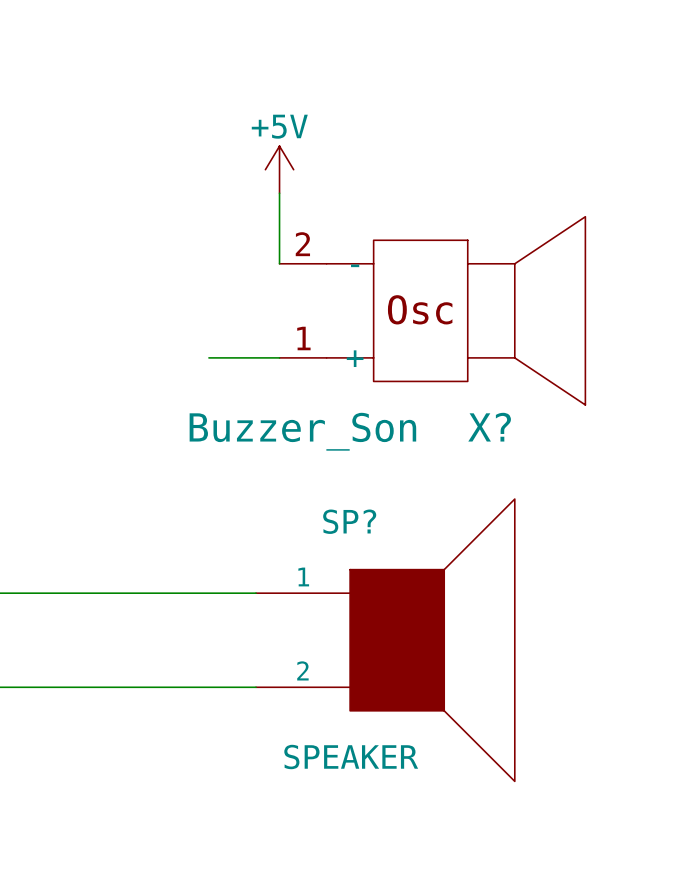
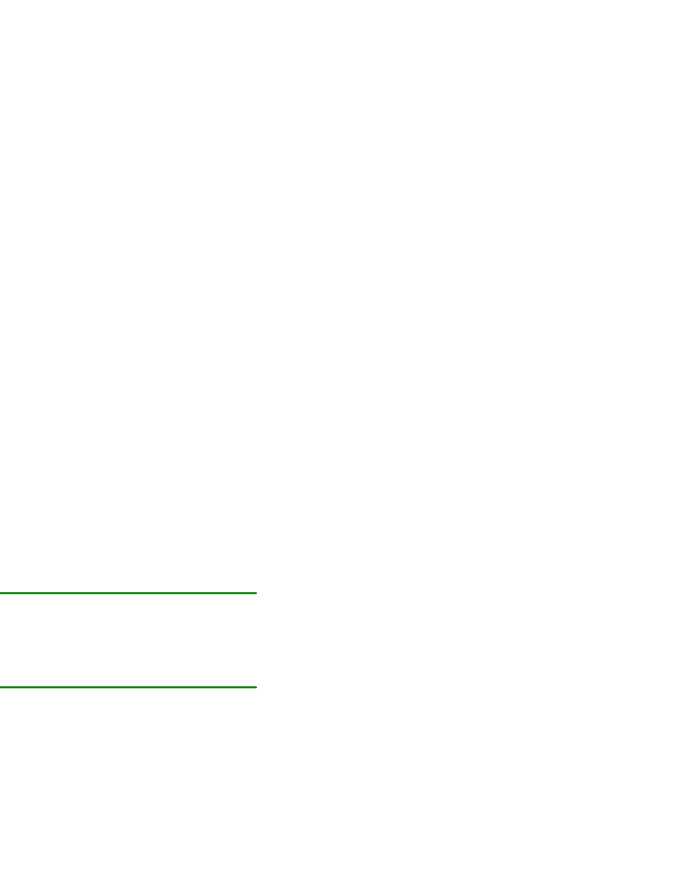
power symbol: +5V (279, 169) -> none
wire: (279, 193) (279, 263) -> none
X?: Buzzer_Son (432, 310) -> none
wire: (208, 357) (279, 357) -> none
SP?: SPEAKER (385, 640) -> none

